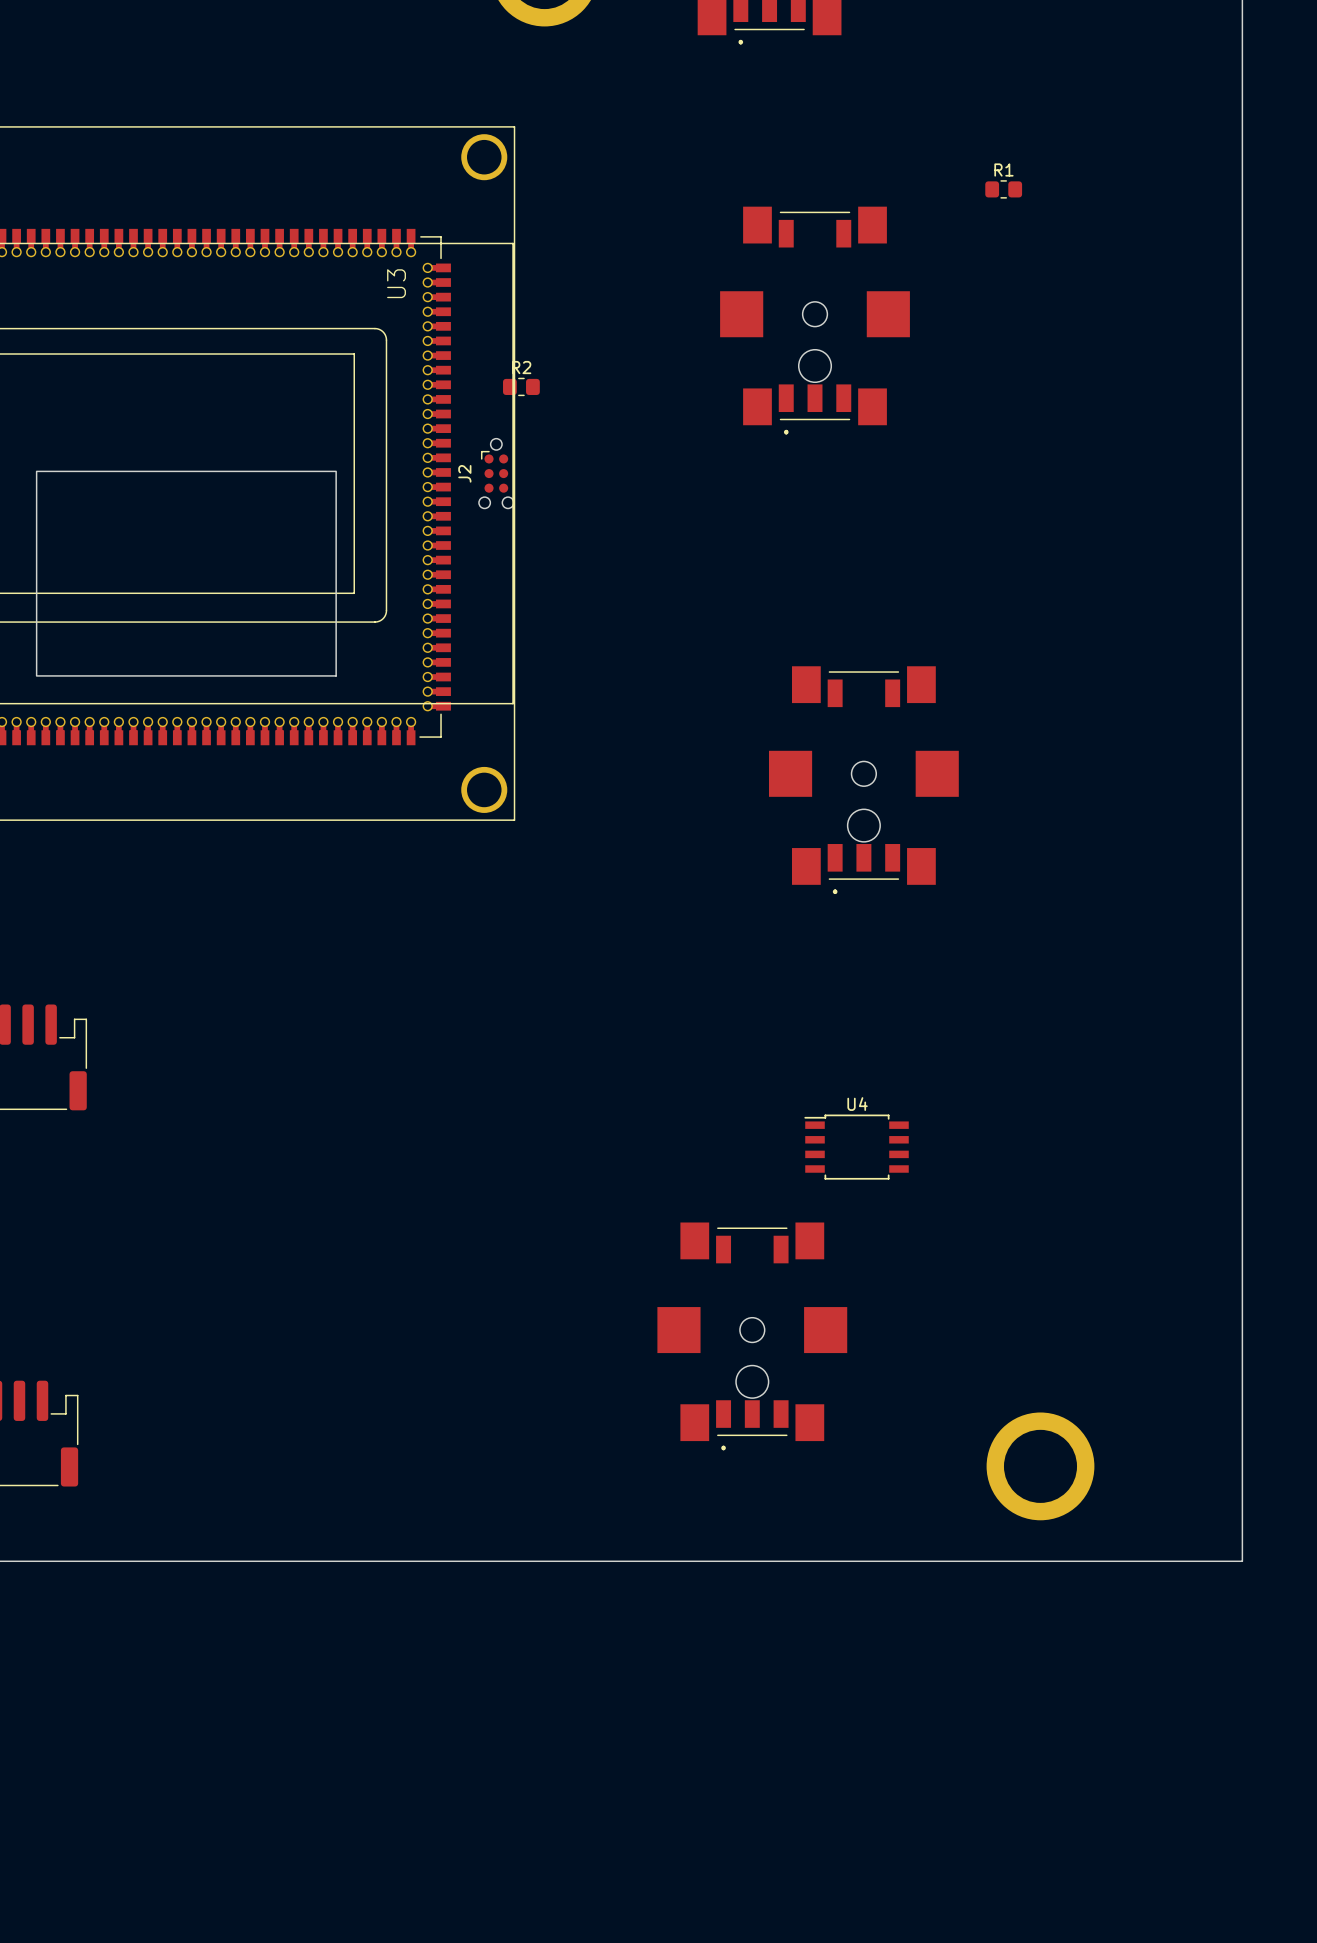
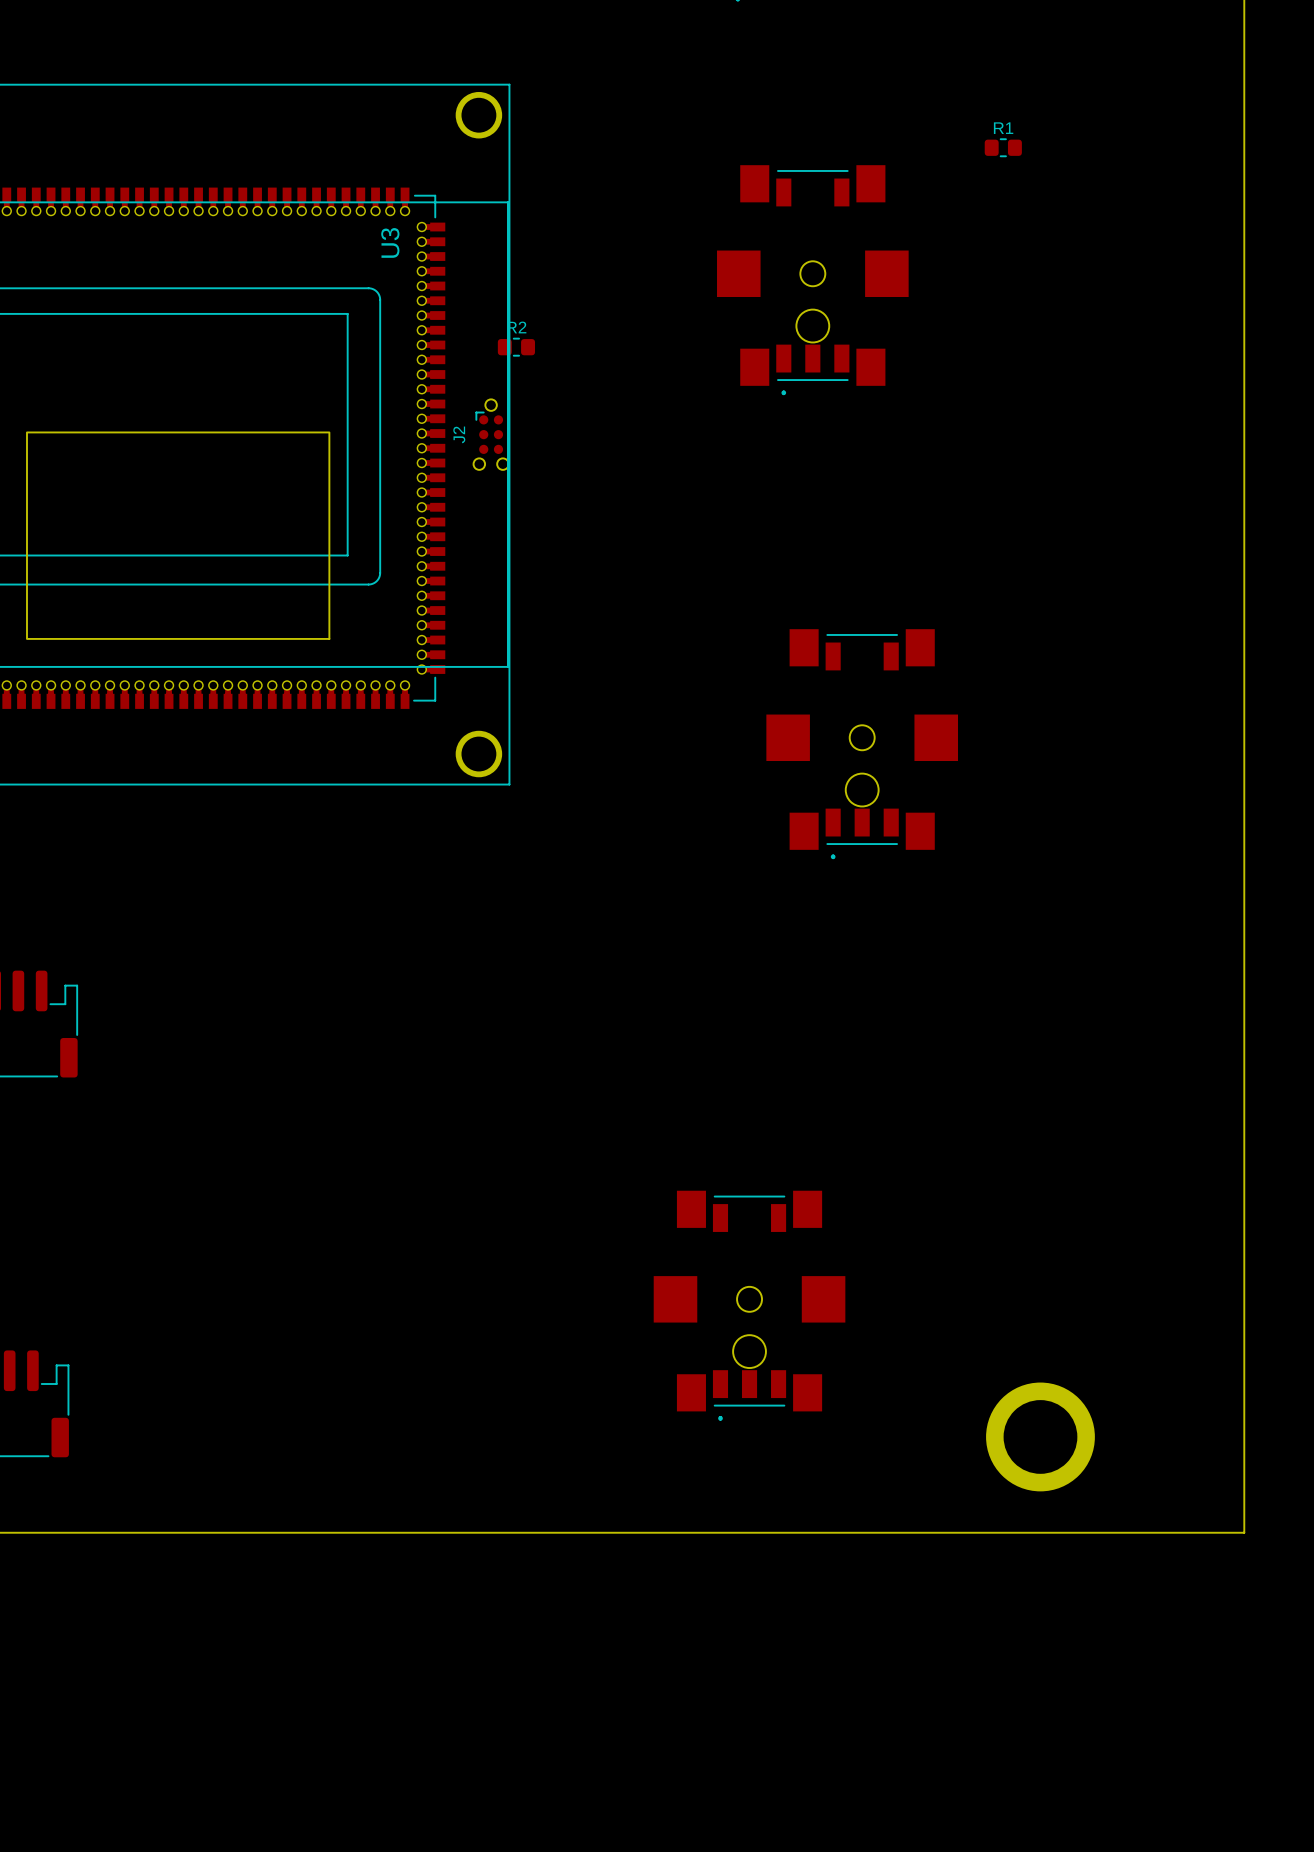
U4: (856, 1147) -> none

